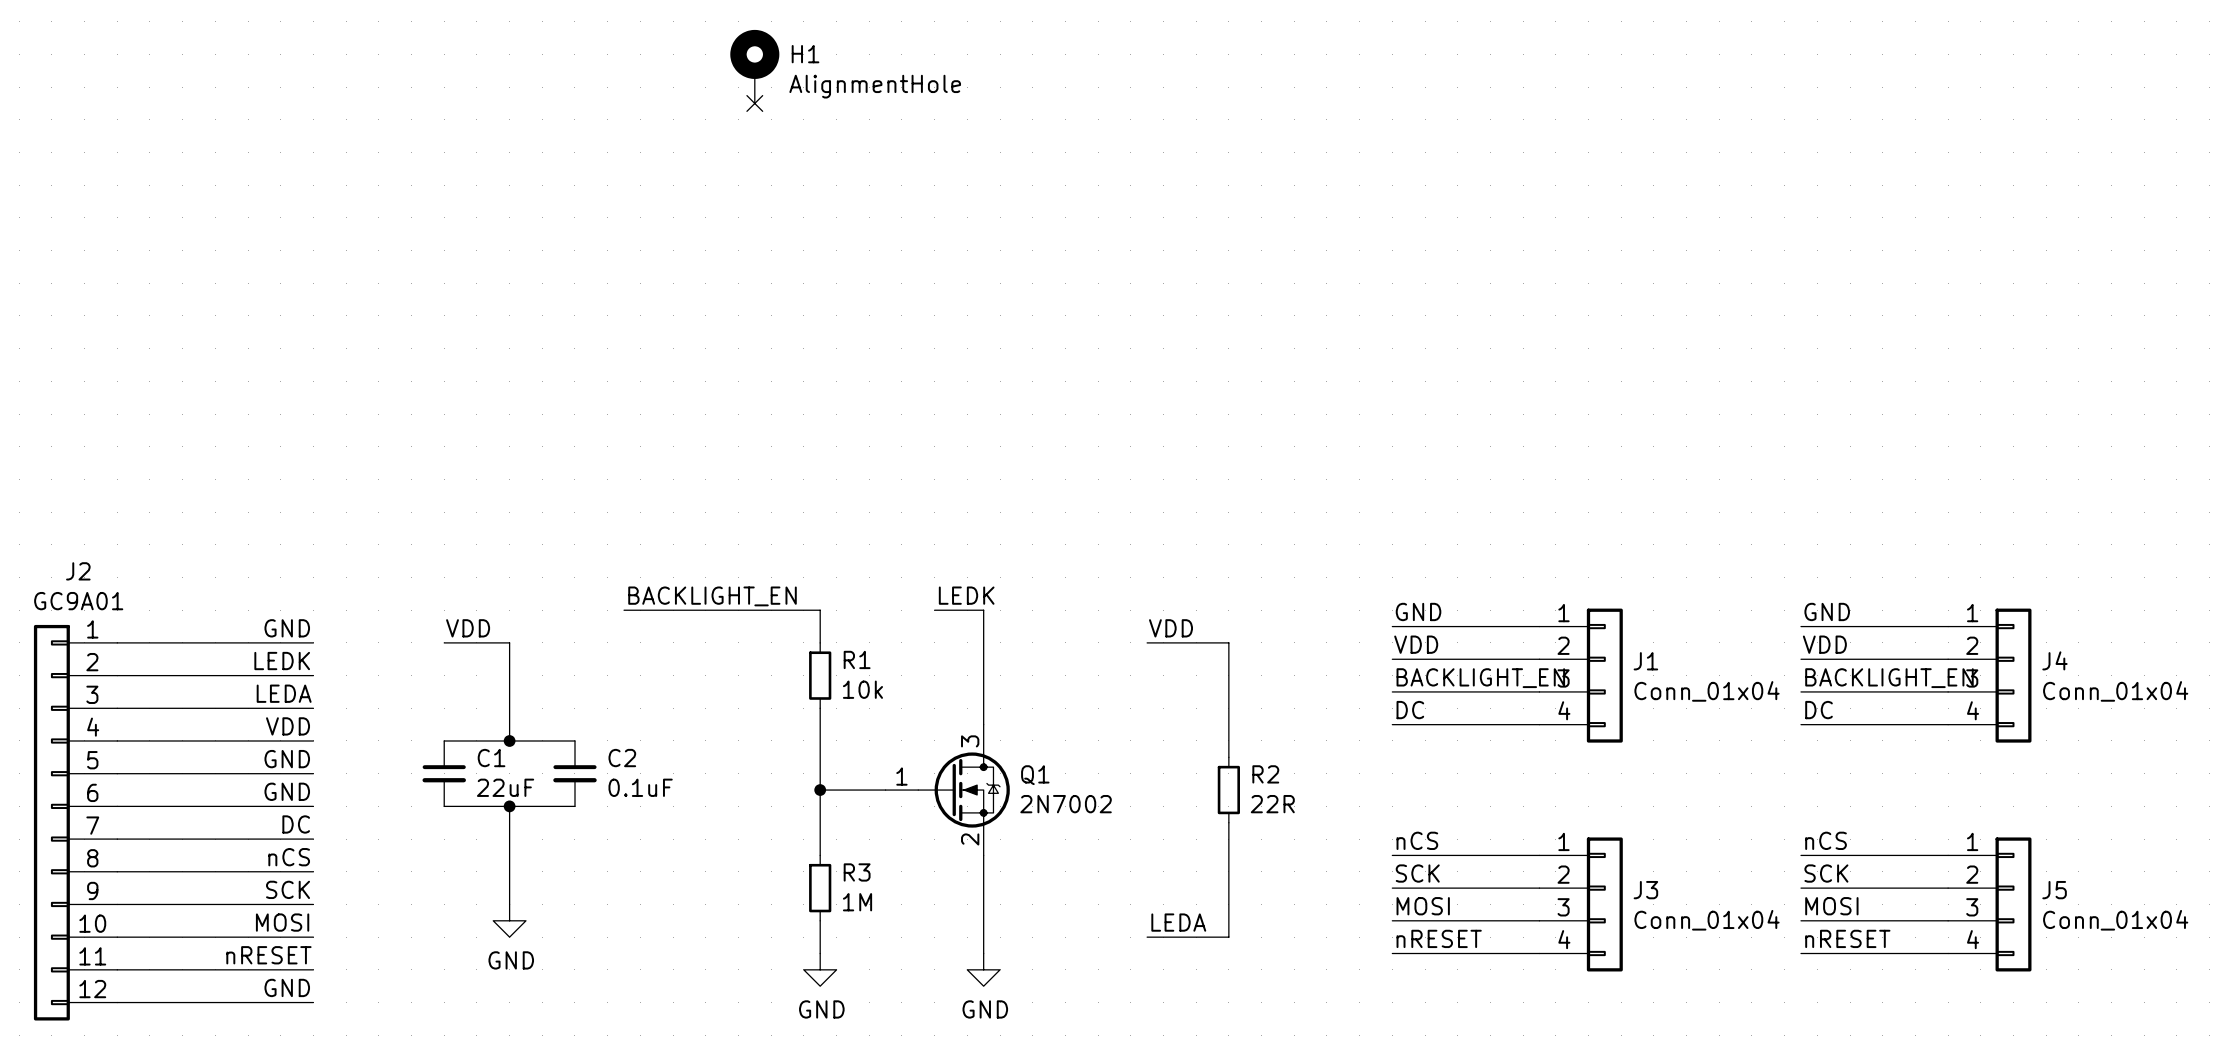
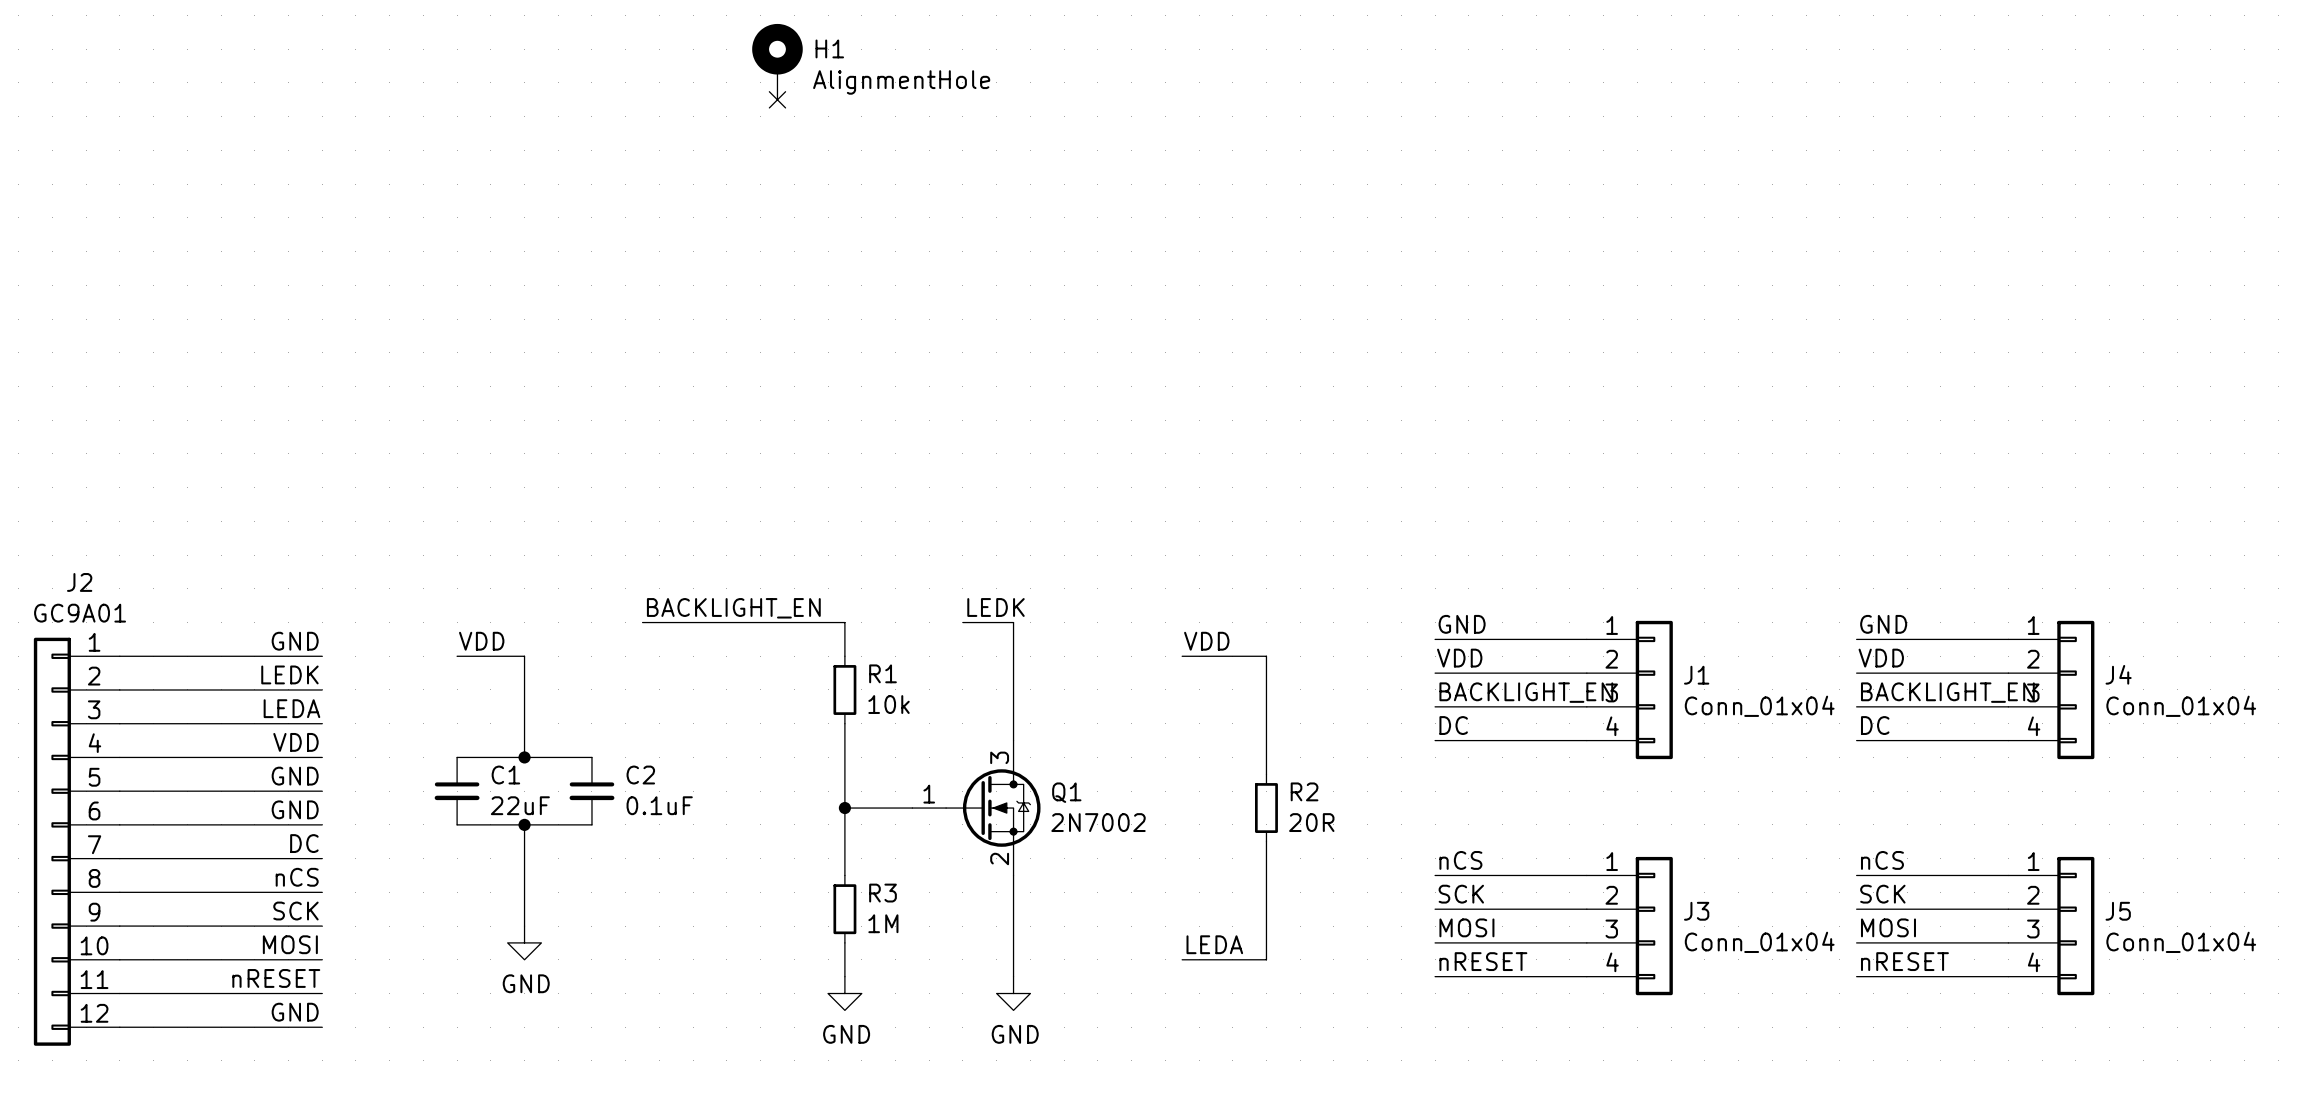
R2 value: 22R (1272, 804) -> 20R (1311, 822)

